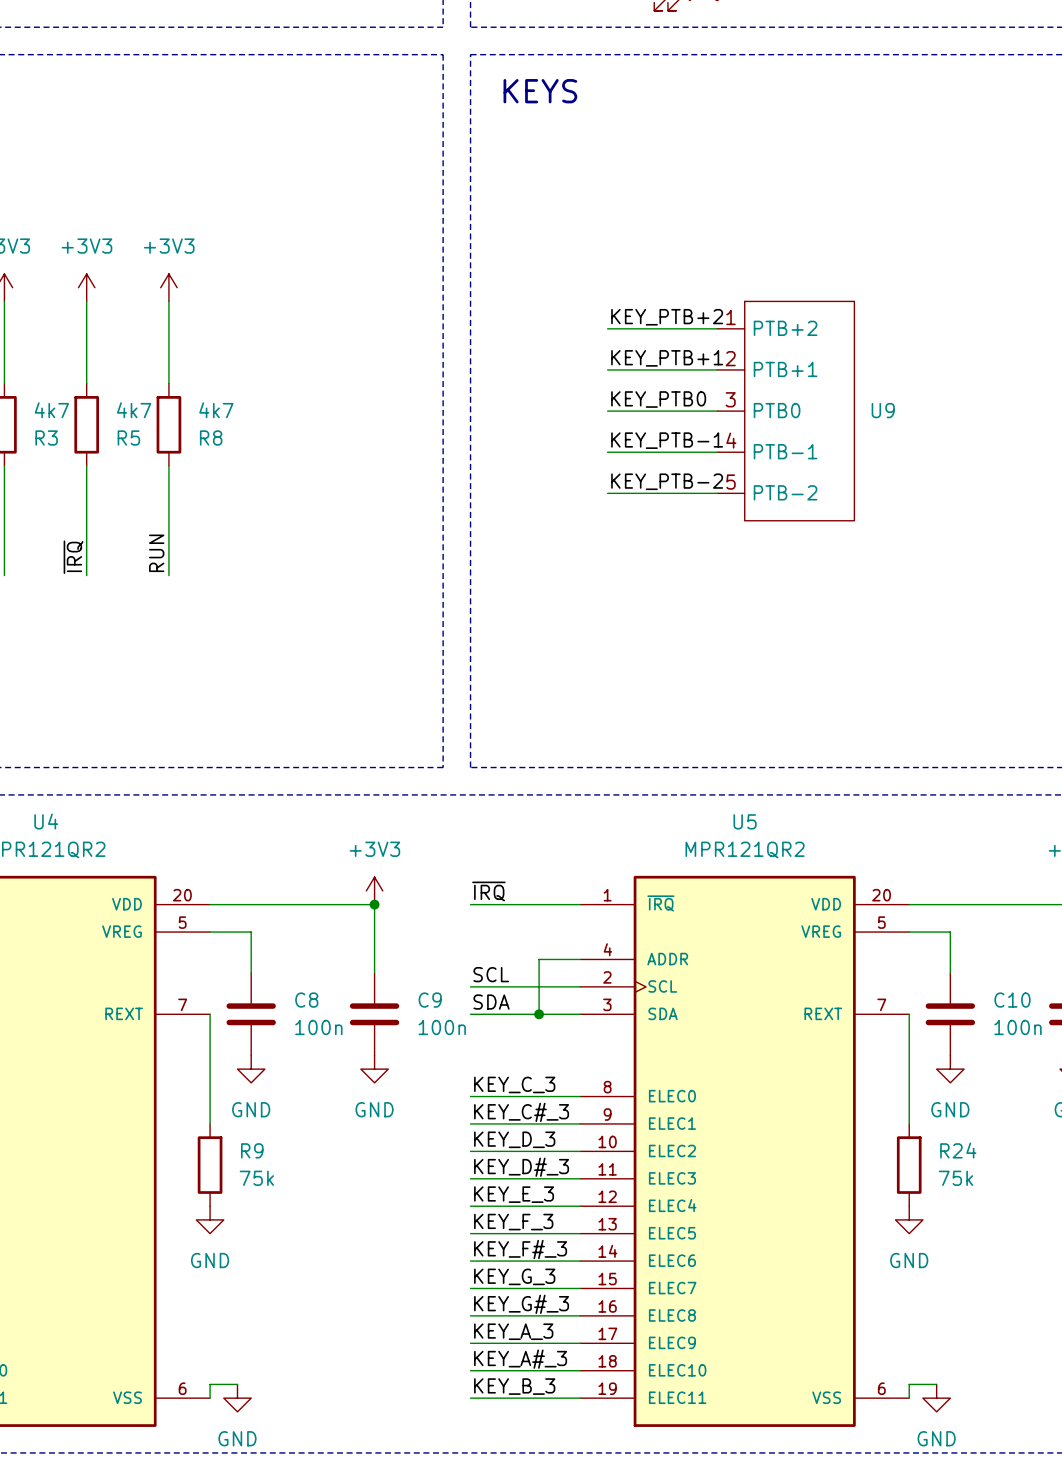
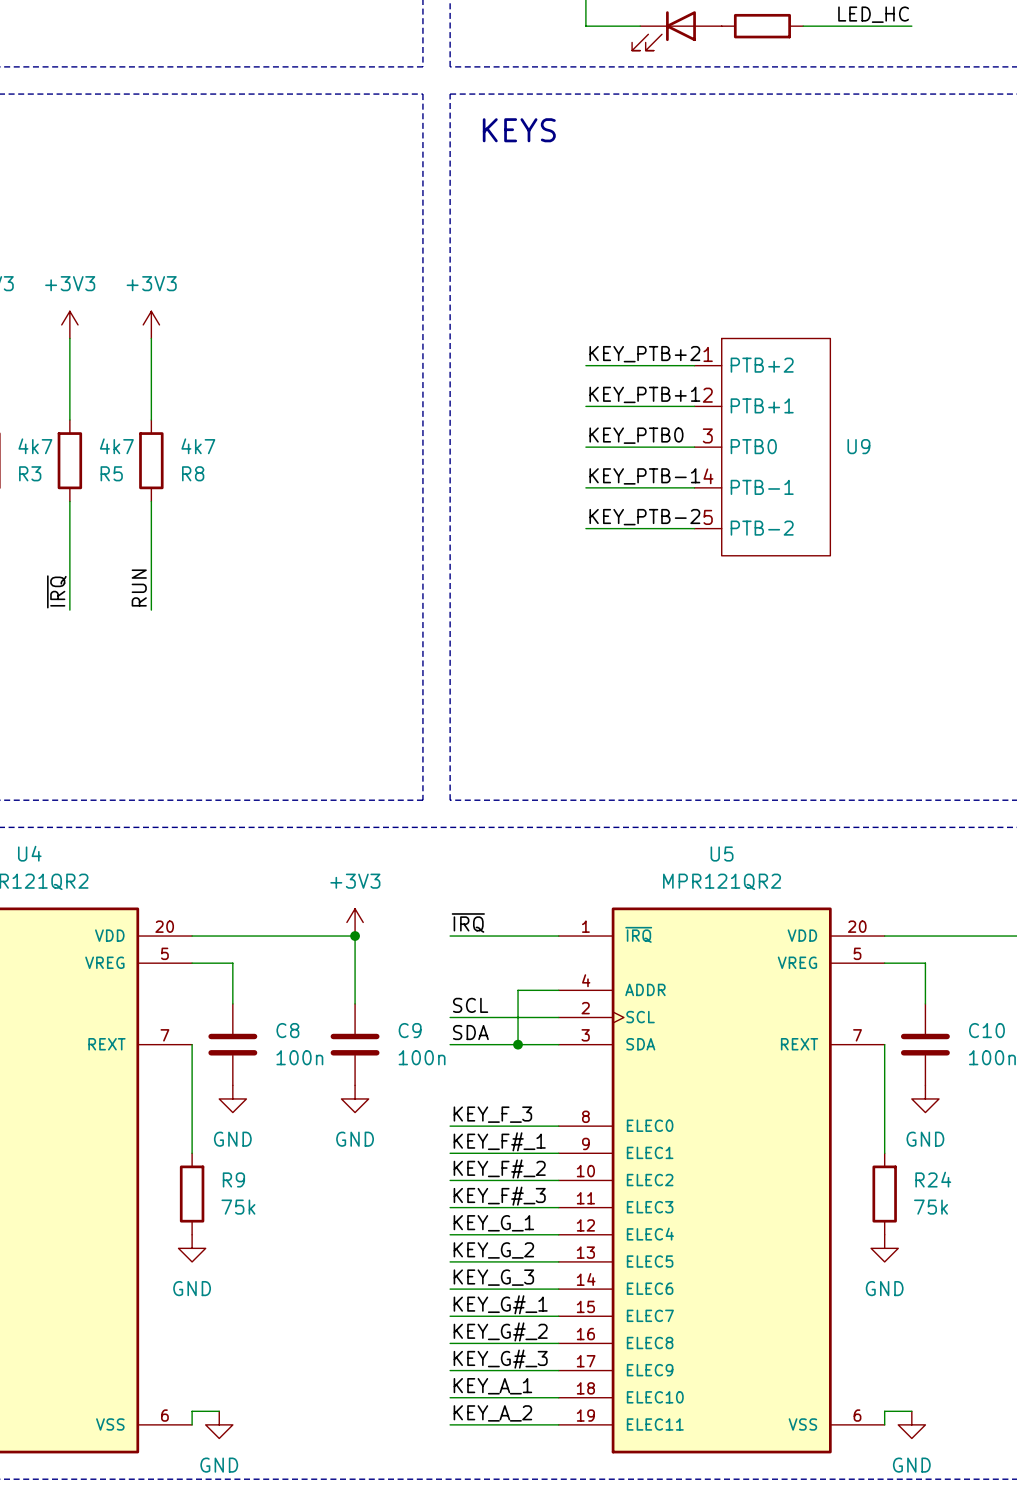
label: KEY_C_3 (514, 1084) -> KEY_F_3 (492, 1114)
label: KEY_C#_3 (521, 1112) -> KEY_F#_1 (499, 1141)
label: KEY_D_3 (514, 1139) -> KEY_F#_2 (499, 1168)
label: KEY_D#_3 (521, 1167) -> KEY_F#_3 (499, 1196)
label: KEY_E_3 (514, 1194) -> KEY_G_1 (493, 1223)
label: KEY_F_3 (513, 1222) -> KEY_G_2 (493, 1250)
label: KEY_F#_3 (520, 1249) -> KEY_G_3 (493, 1277)
label: KEY_G_3 (514, 1276) -> KEY_G#_1 (500, 1304)
label: KEY_G#_3 (521, 1304) -> KEY_G#_2 (500, 1331)
label: KEY_A_3 (513, 1331) -> KEY_G#_3 (500, 1359)
label: KEY_A#_3 (520, 1359) -> KEY_A_1 (492, 1386)
label: KEY_B_3 (514, 1386) -> KEY_A_2 (492, 1413)

